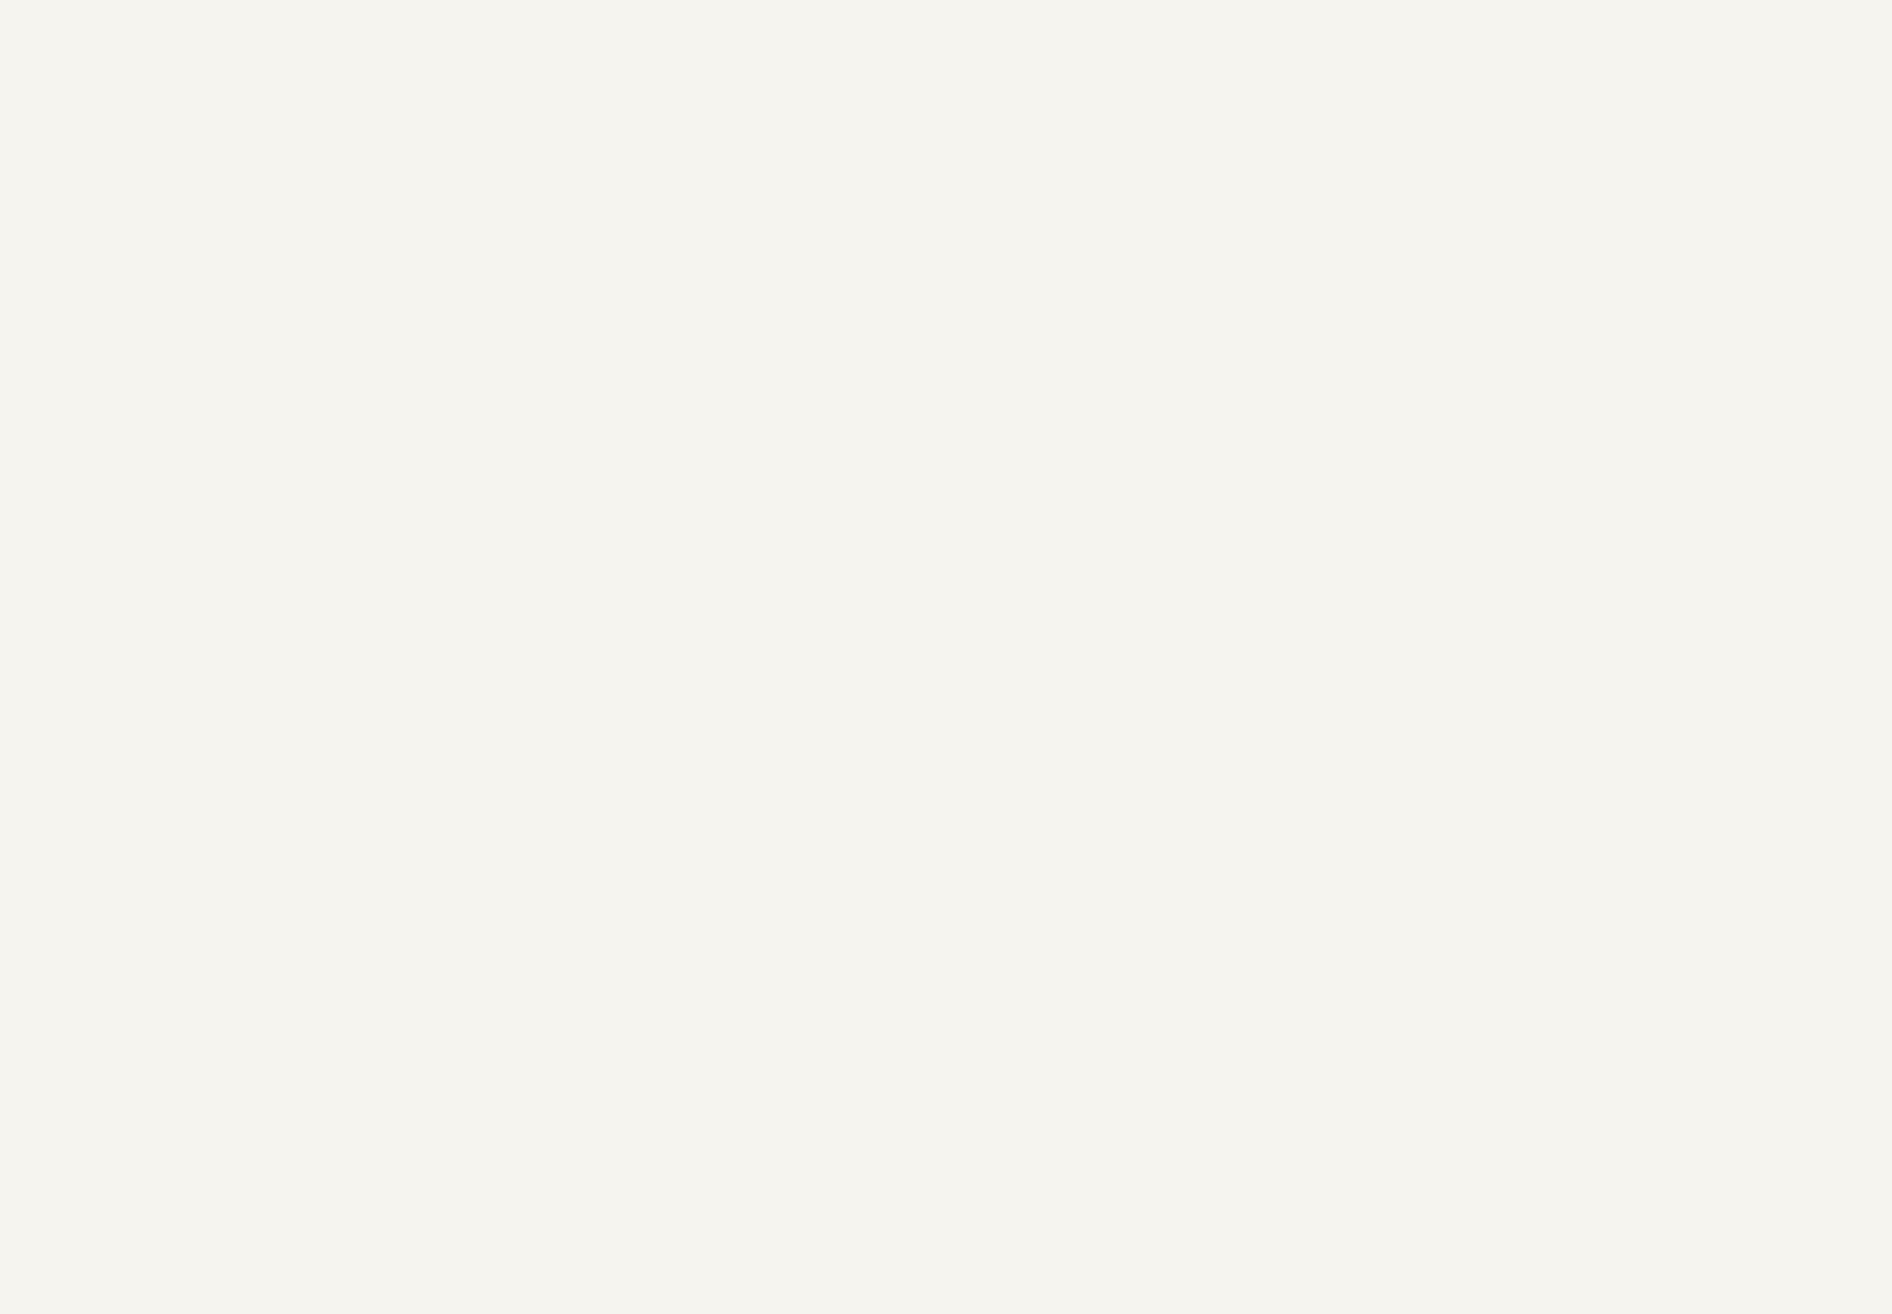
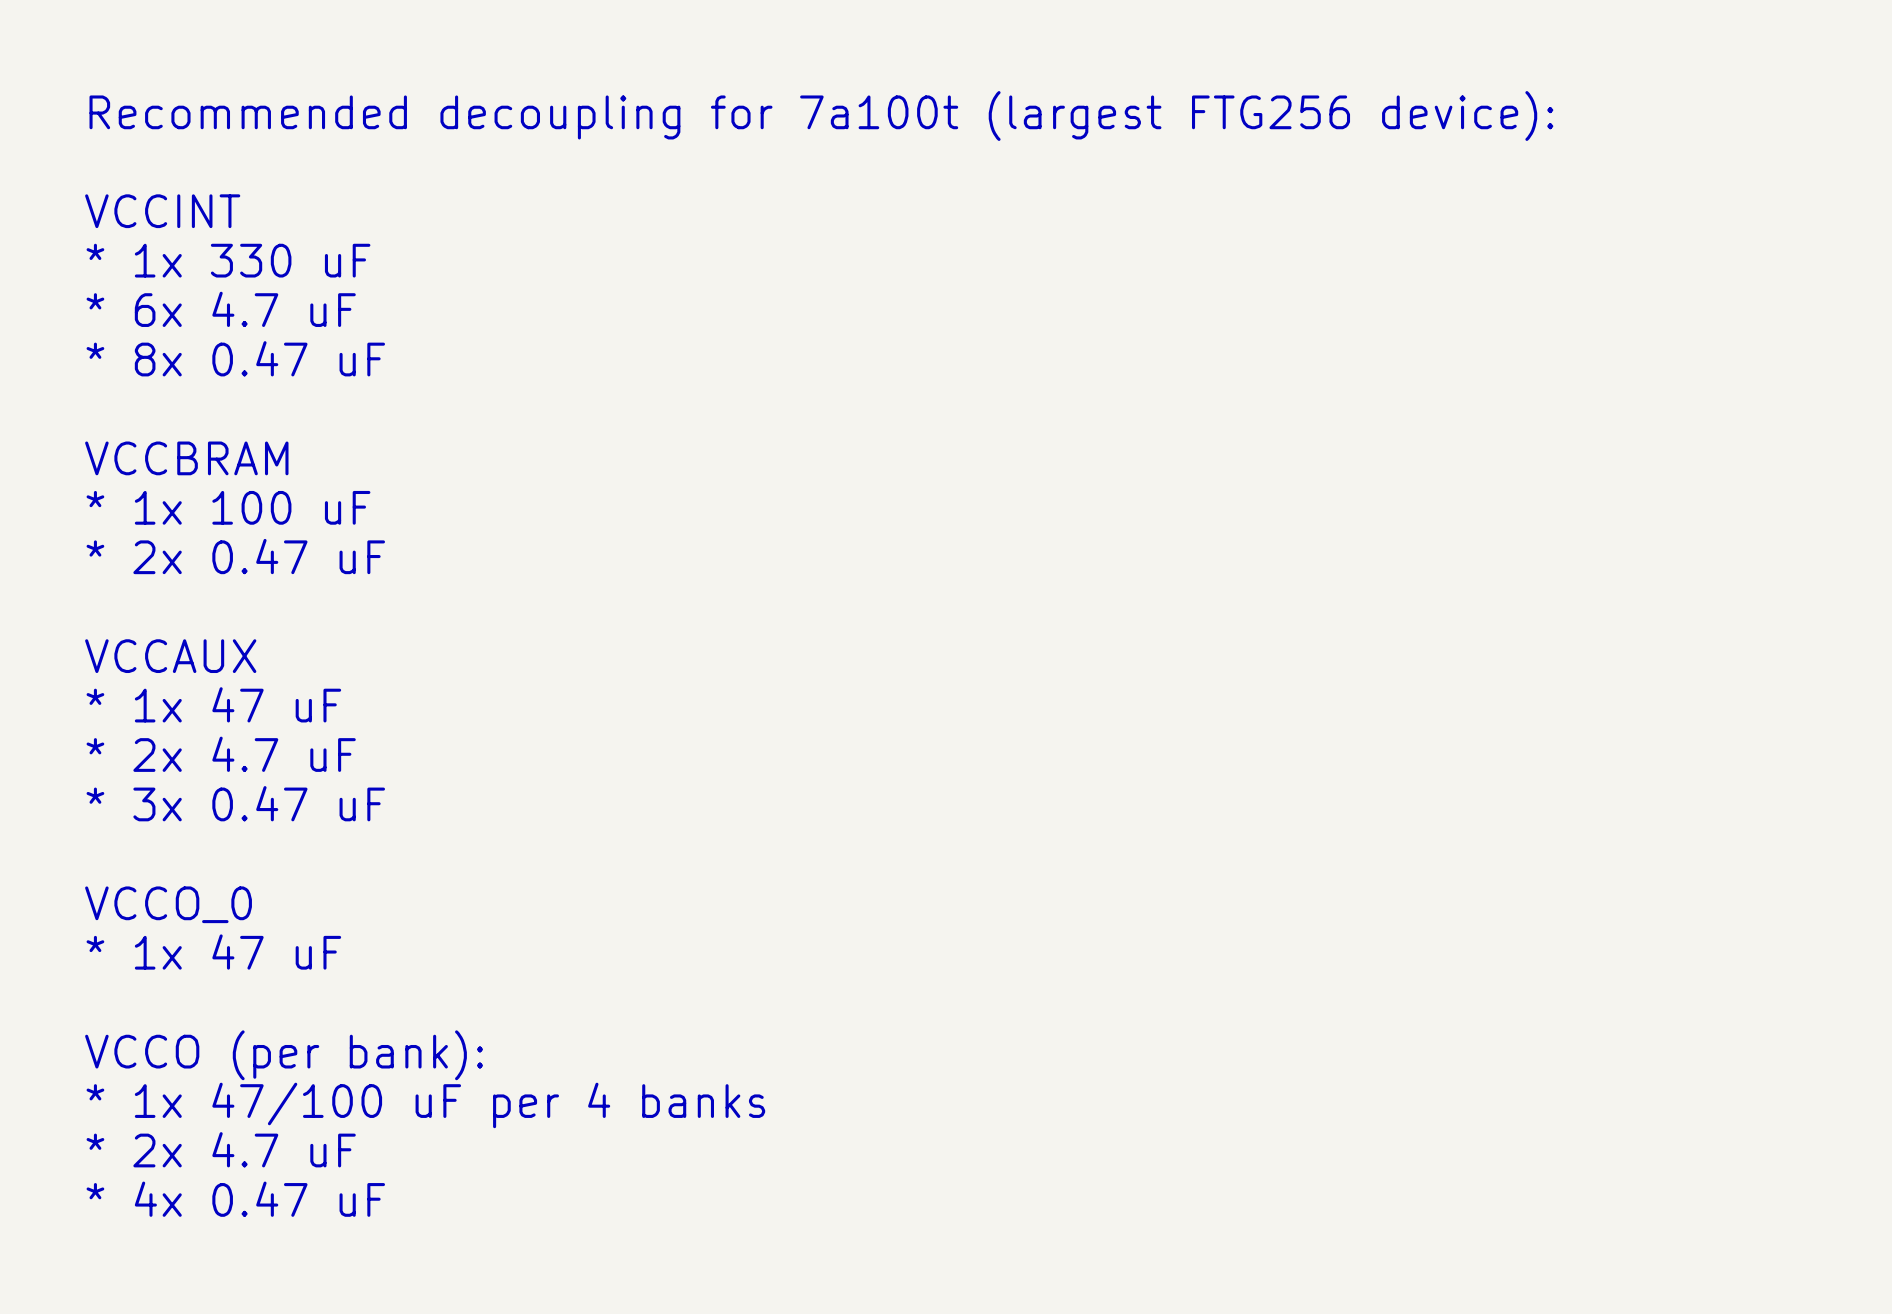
text: none -> Recommended decoupling for 7a100t (largest FTG256 device): (821, 116)
text: none -> VCCINT (162, 211)
text: none -> * 1x 330 uF (228, 260)
text: none -> * 6x 4.7 uF (221, 309)
text: none -> * 8x 0.47 uF (235, 358)
text: none -> VCCBRAM (186, 458)
text: none -> * 1x 100 uF (228, 507)
text: none -> * 2x 0.47 uF (235, 556)
text: none -> VCCAUX (170, 656)
text: none -> * 1x 47 uF (213, 704)
text: none -> * 2x 4.7 uF (221, 754)
text: none -> * 3x 0.47 uF (235, 803)
text: none -> VCCO_0 (168, 904)
text: none -> * 1x 47 uF (213, 952)
text: none -> VCCO (per bank): (284, 1055)
text: none -> * 1x 47/100 uF per 4 banks (425, 1105)
text: none -> * 2x 4.7 uF (221, 1149)
text: none -> * 4x 0.47 uF (235, 1199)

